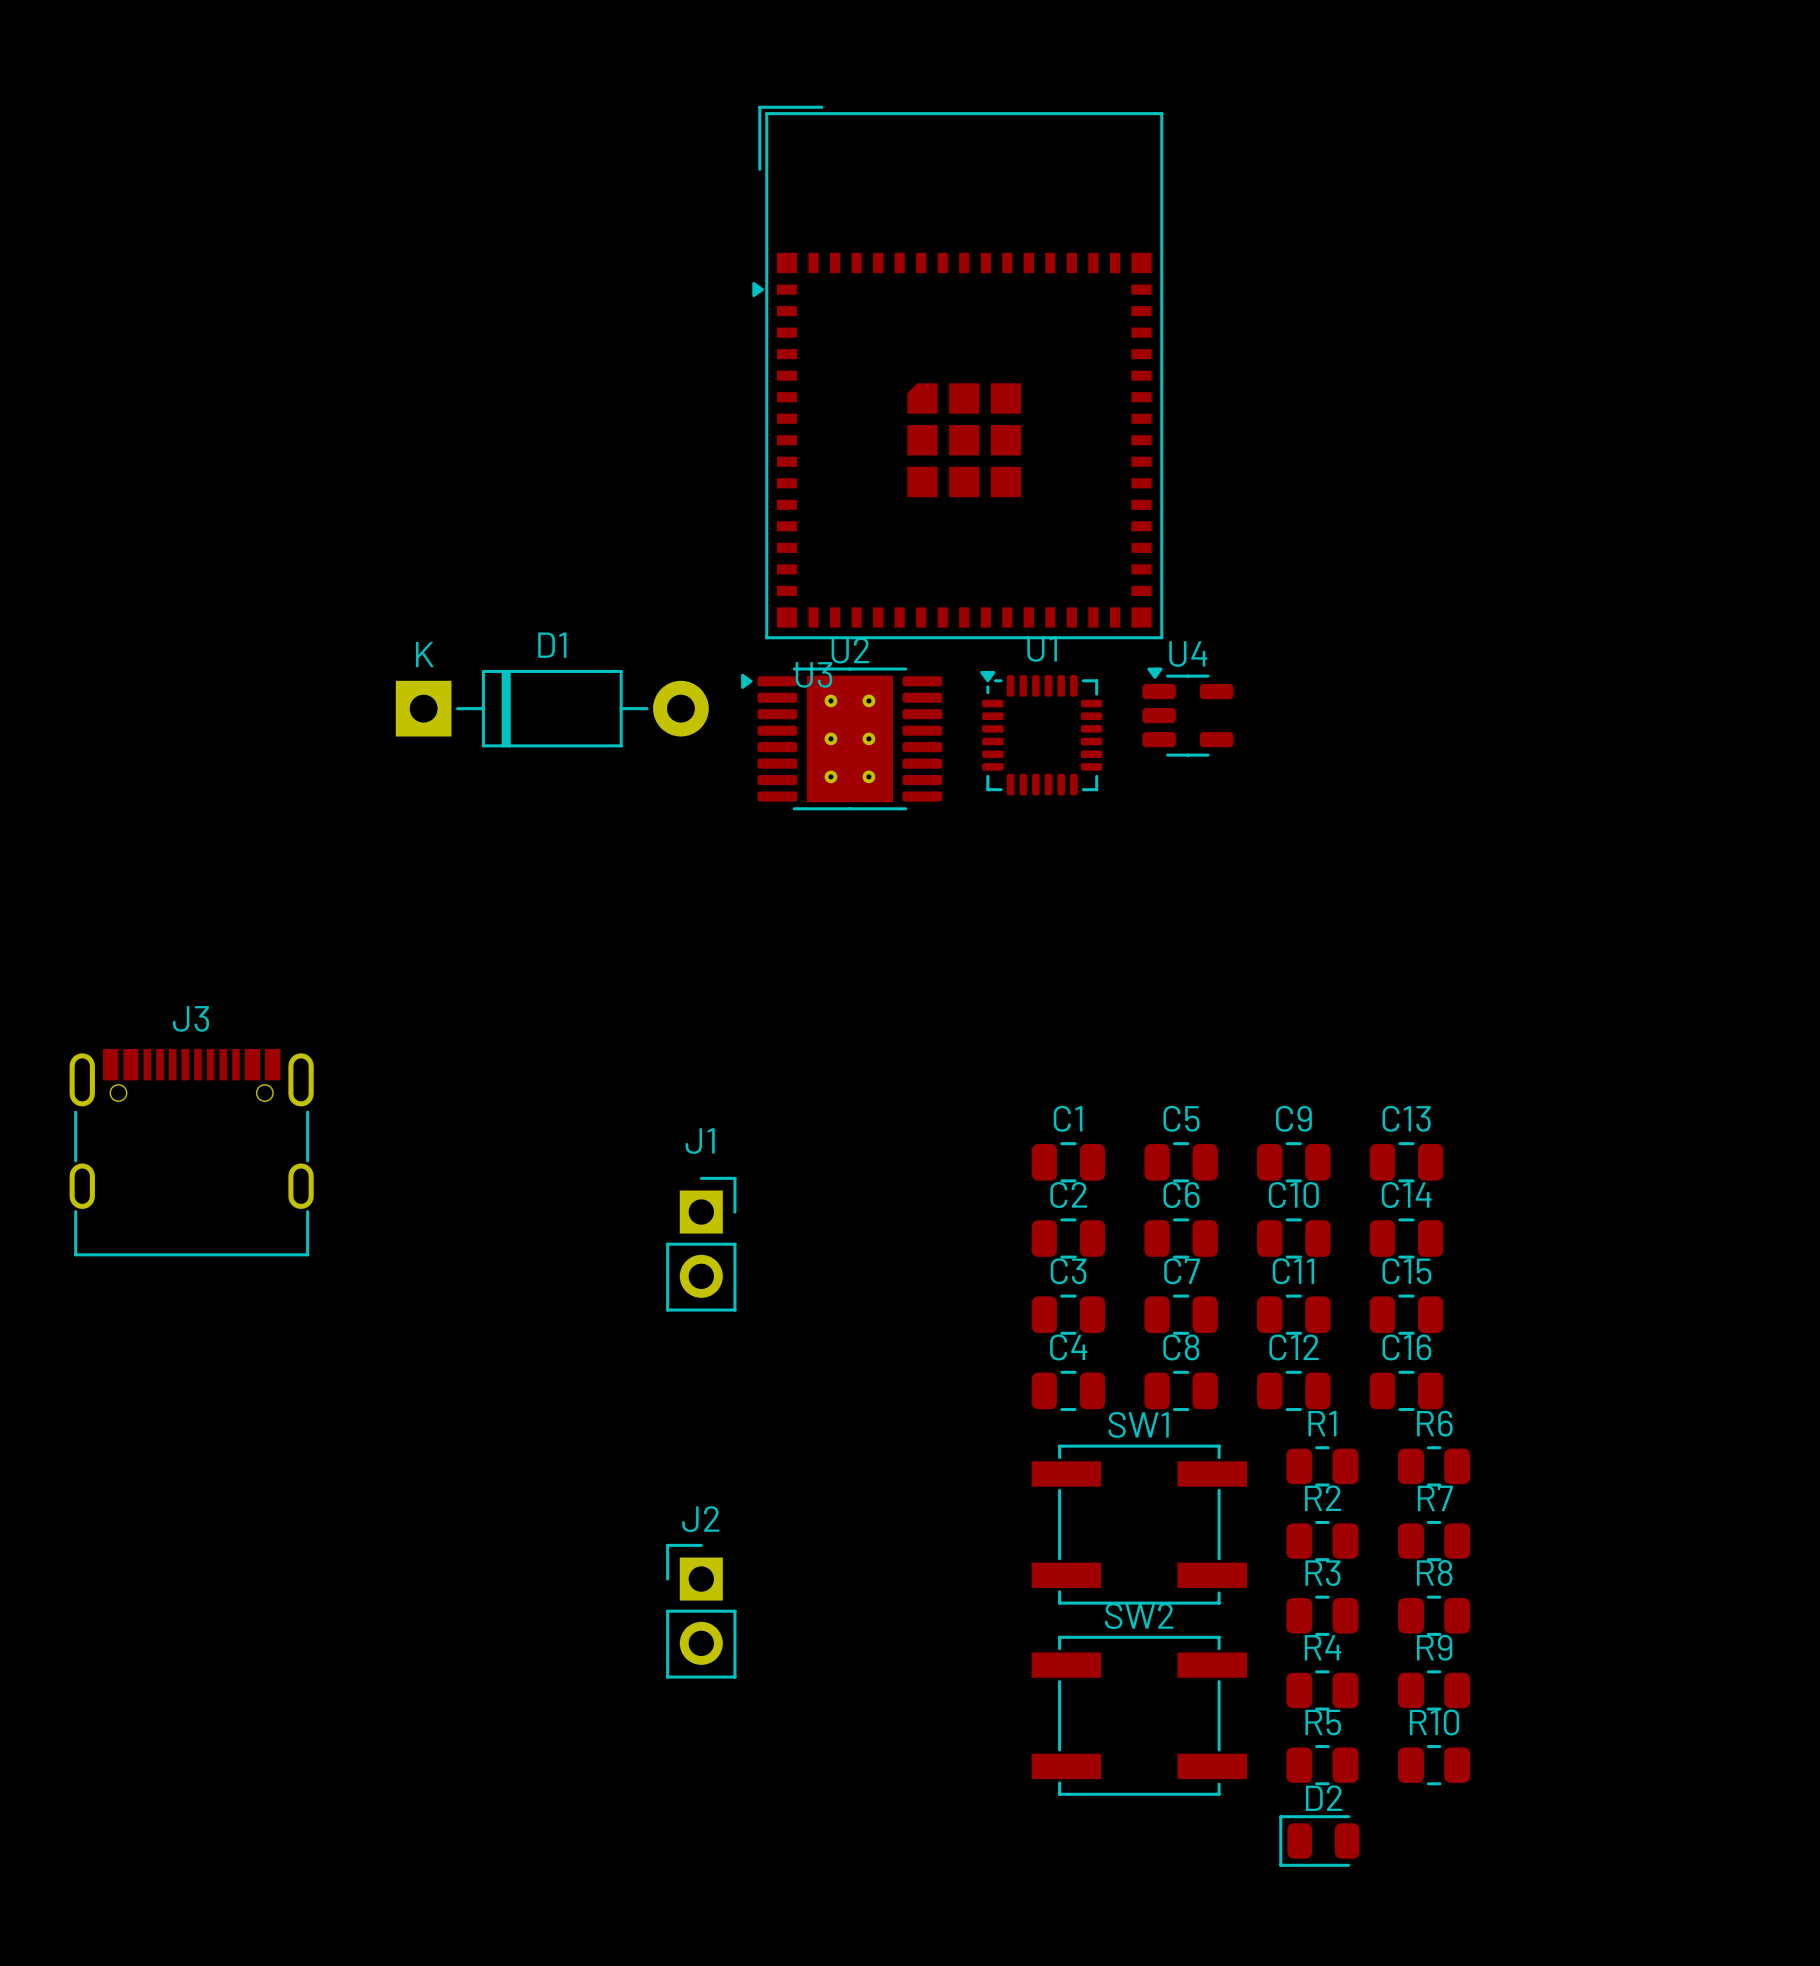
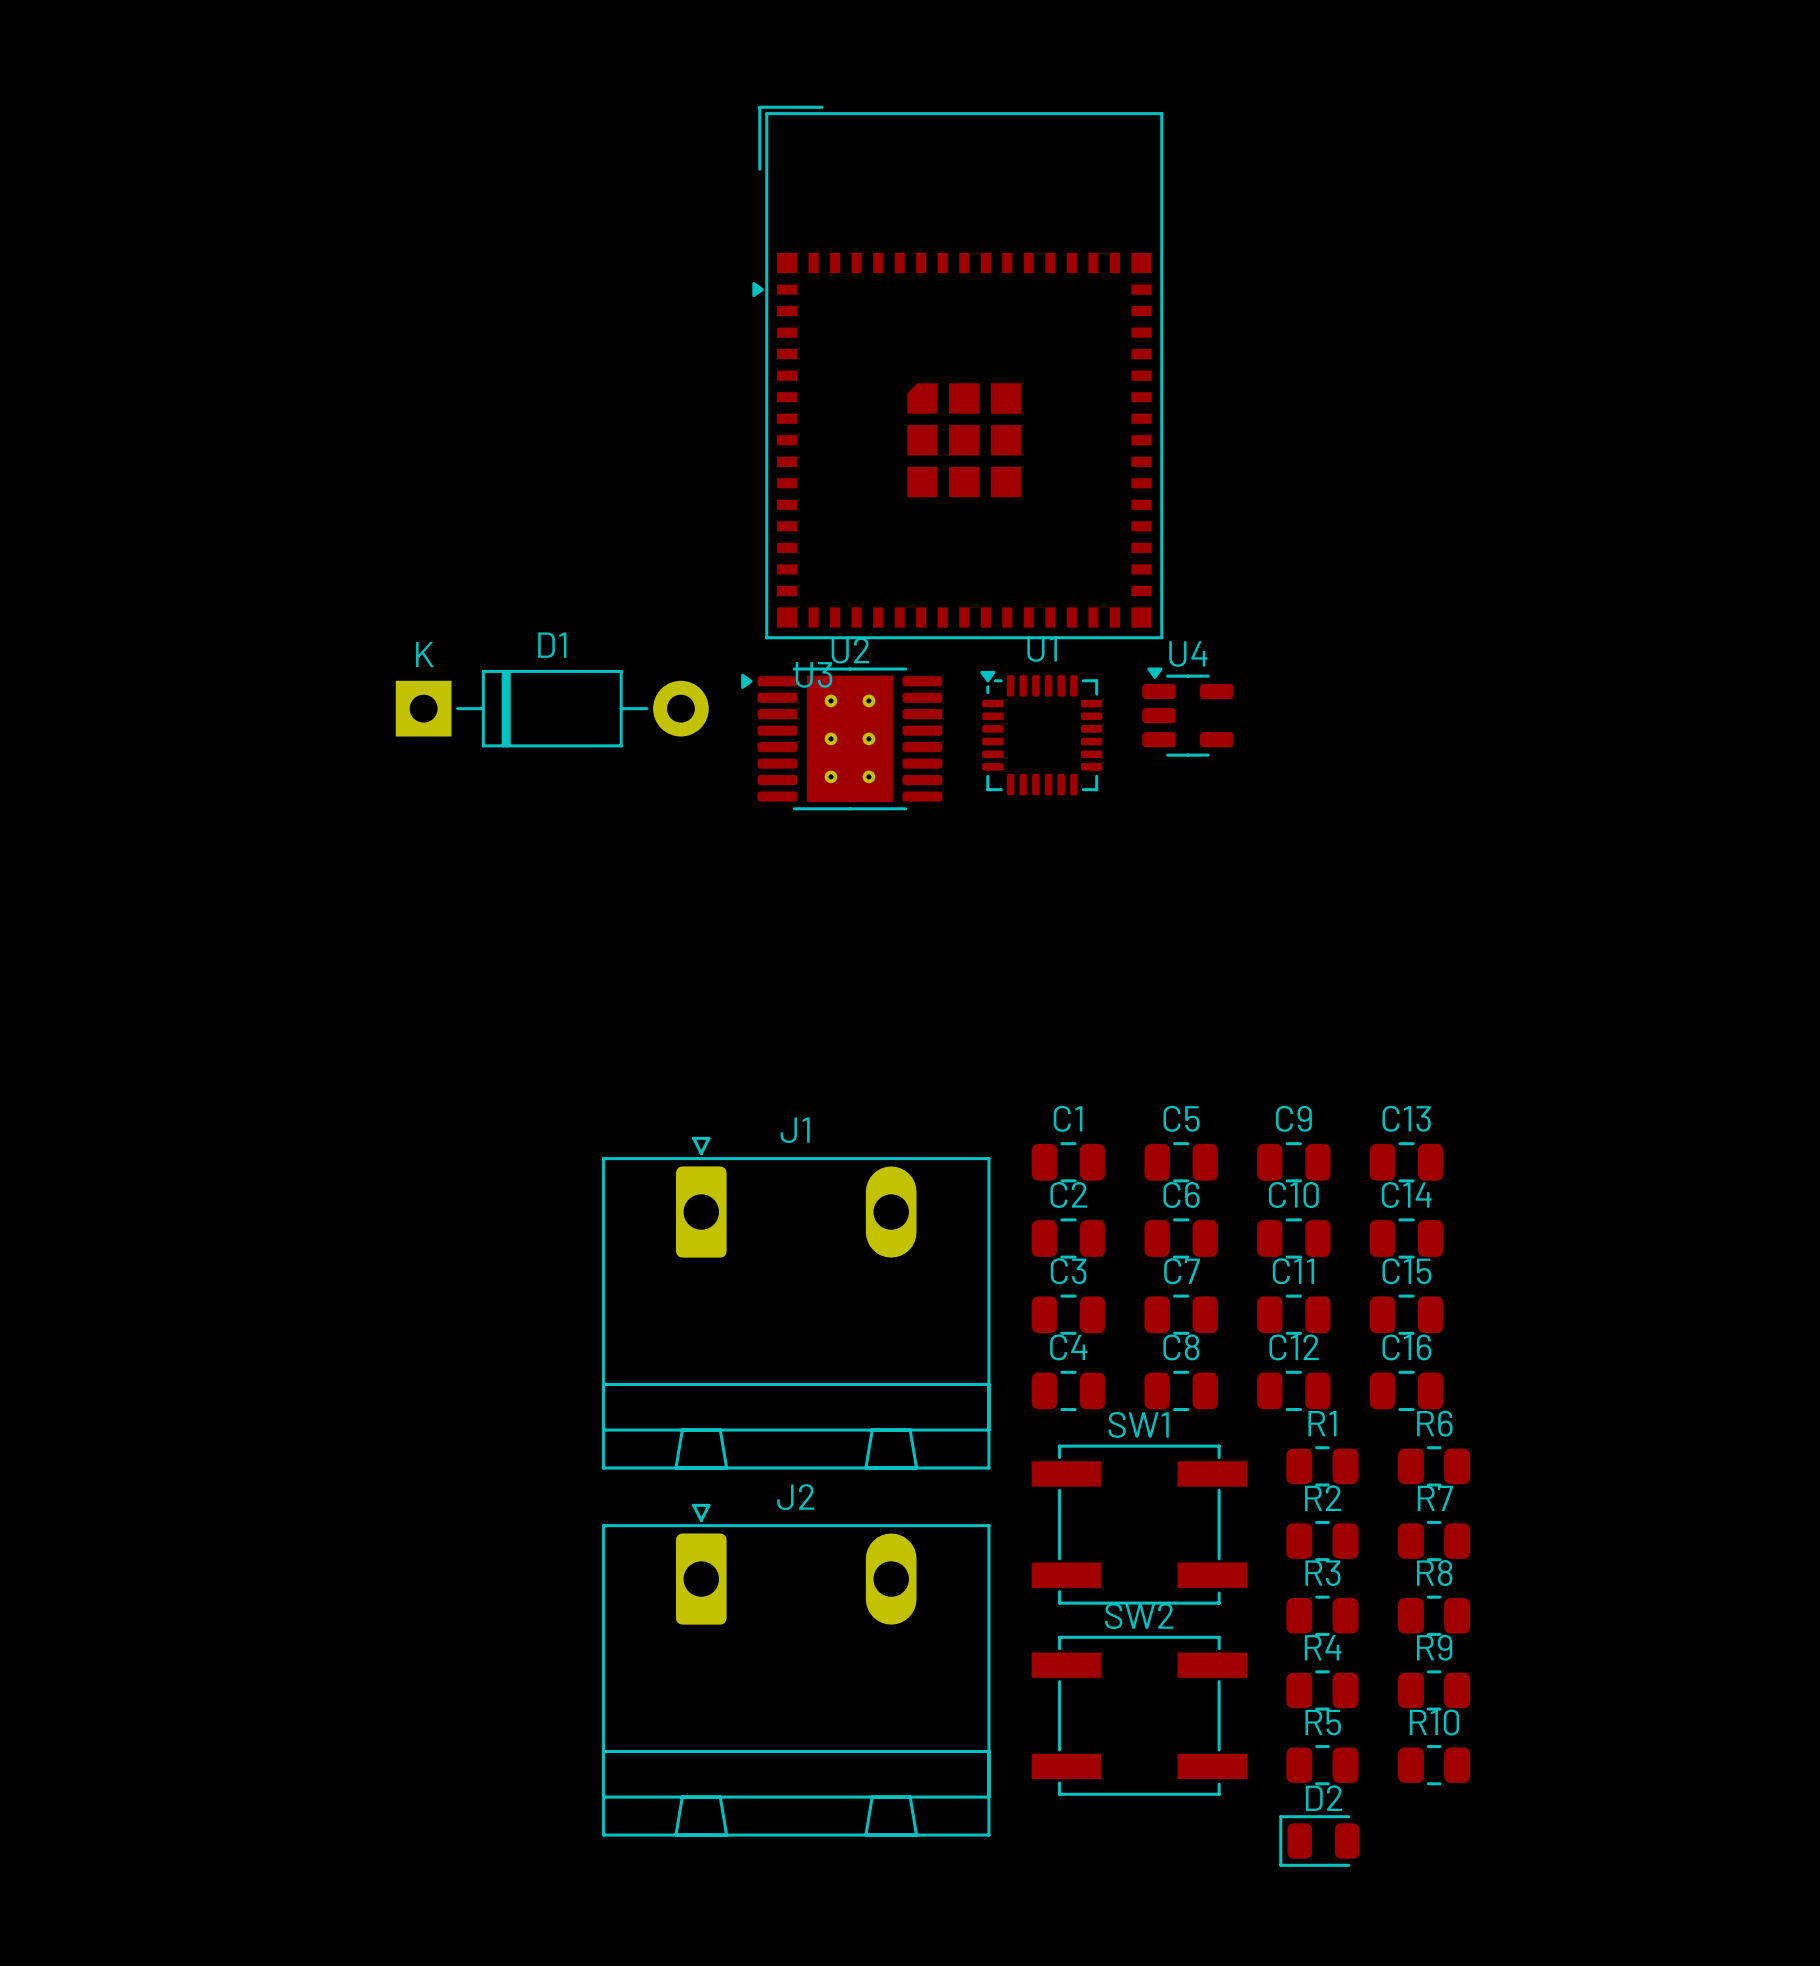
J1 name position: J1 (700, 1141) -> J1 (795, 1130)
J3: (191, 1152) -> none
J1 footprint: [666, 1176, 737, 1312] -> [602, 1136, 991, 1470]
J2 name position: J2 (700, 1519) -> J2 (795, 1497)
J2 footprint: [666, 1543, 737, 1679] -> [602, 1503, 991, 1837]

